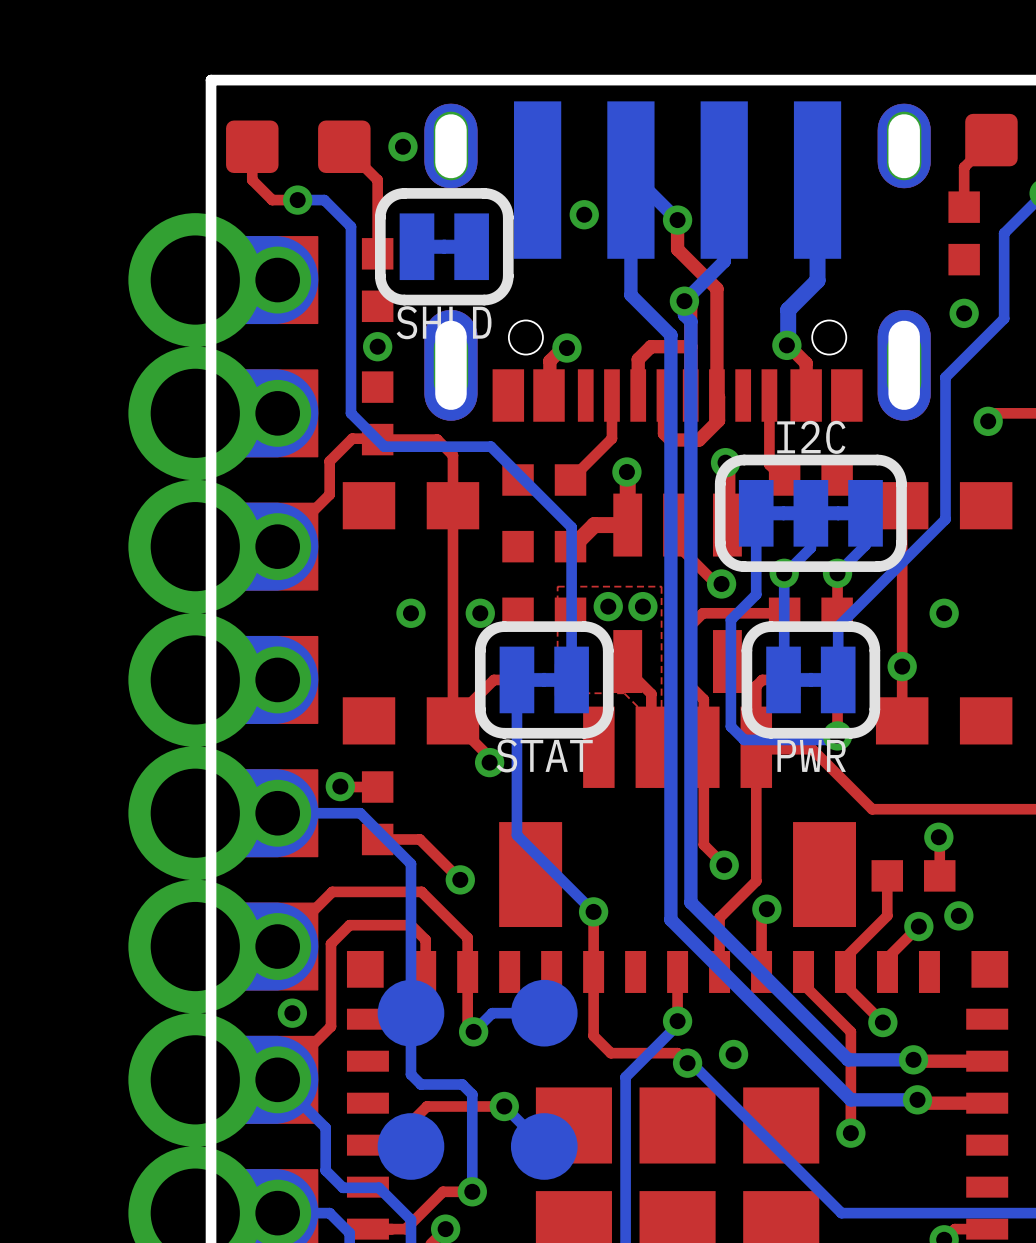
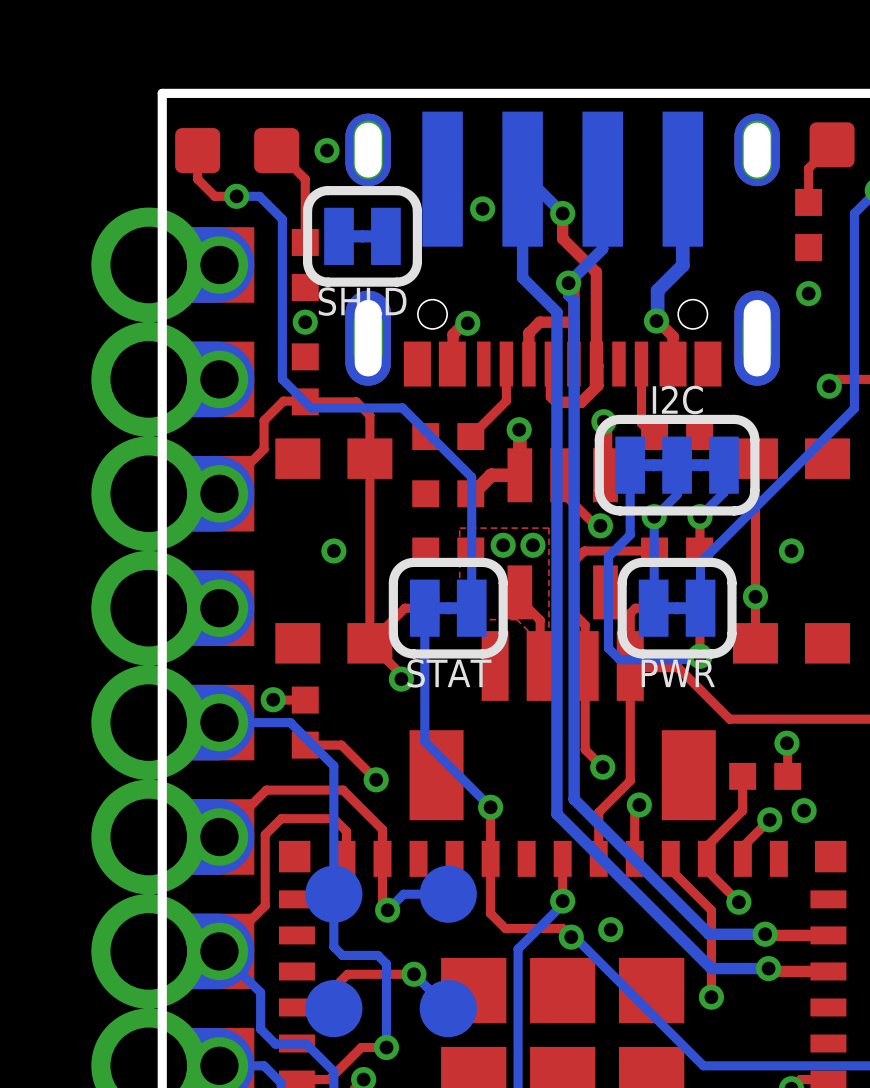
bottom track: (1017, 220) (1004, 233) (1004, 318) (945, 377) (945, 519) -> (854, 213) (854, 408) (792, 470)
via: (480, 613) -> none
via: (292, 1013) -> none

